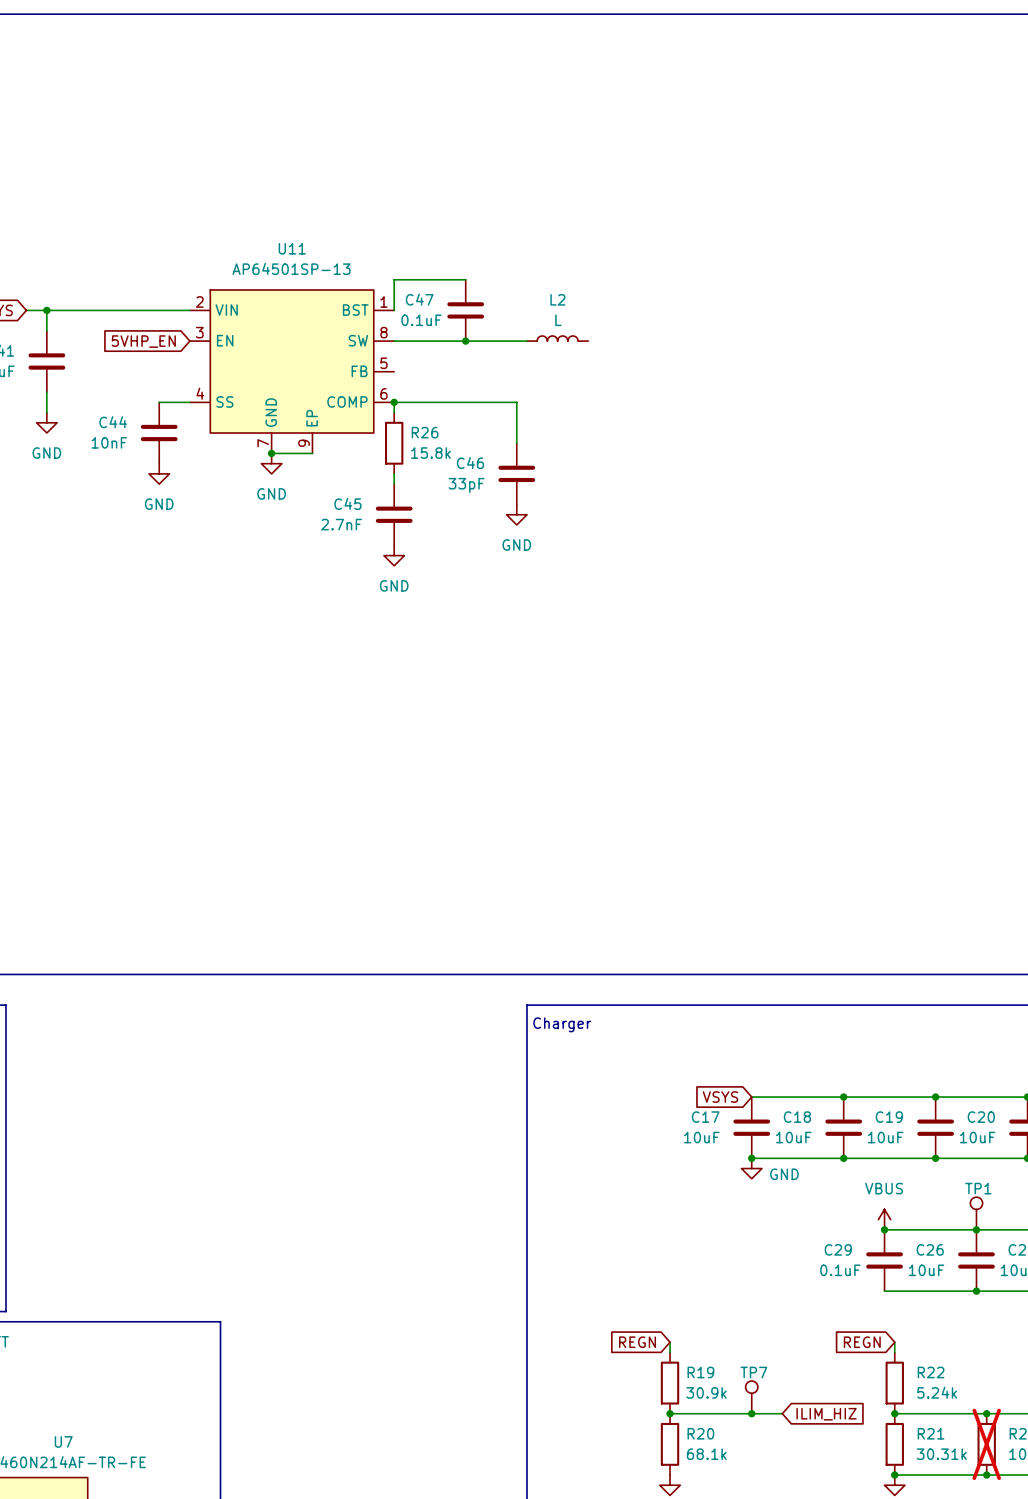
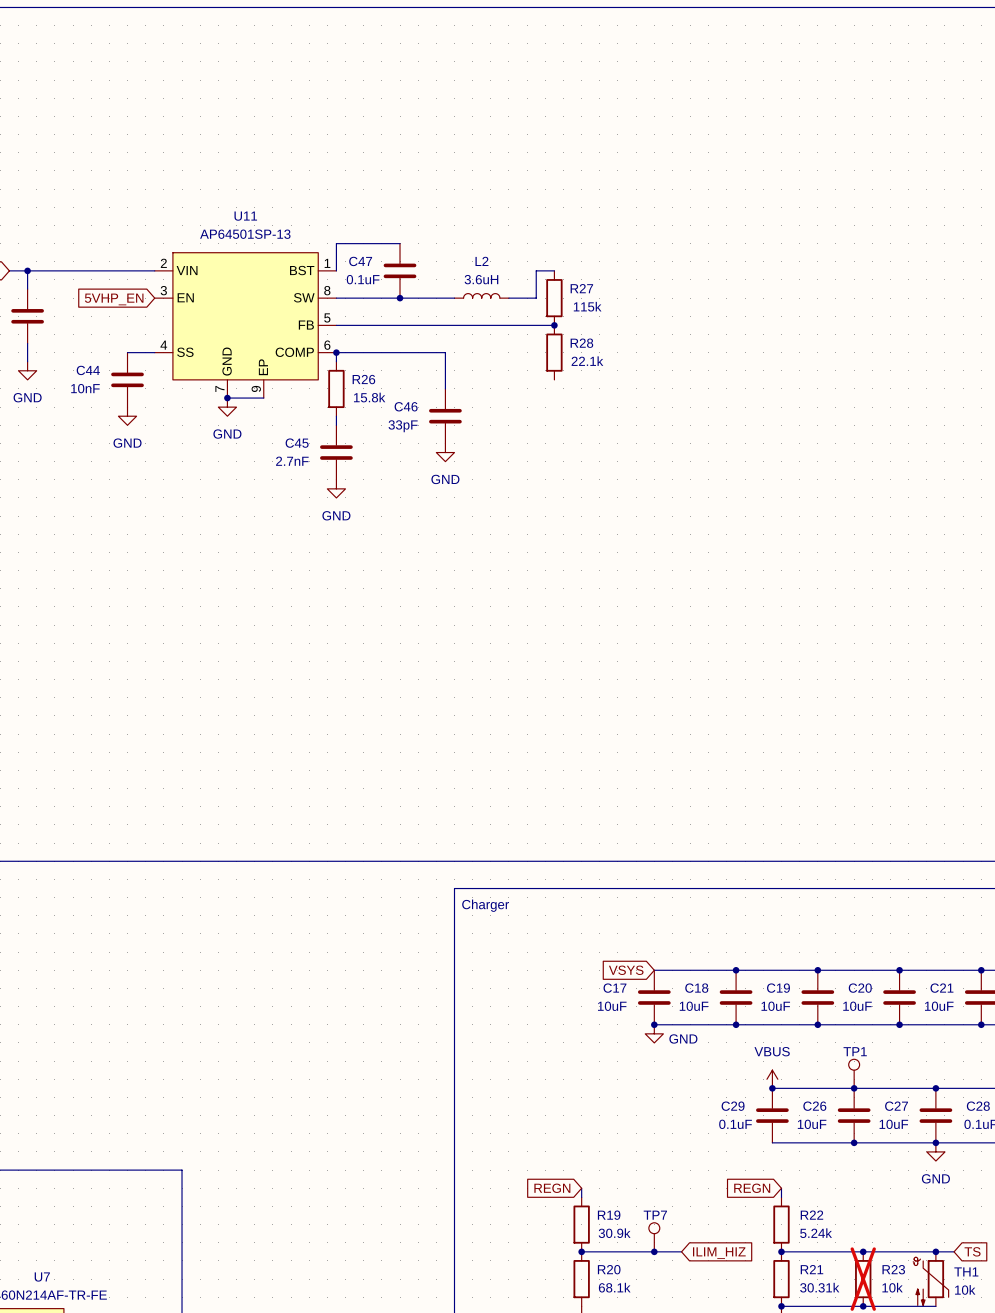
wire: none -> (554, 270) (536, 270) (536, 298) (508, 298)
L2 value: L (558, 320) -> 3.6uH (481, 279)
R27: none -> 115k (554, 298)
wire: none -> (336, 325) (554, 325)
junction: none -> (554, 325)
R28: none -> 22.1k (554, 352)

